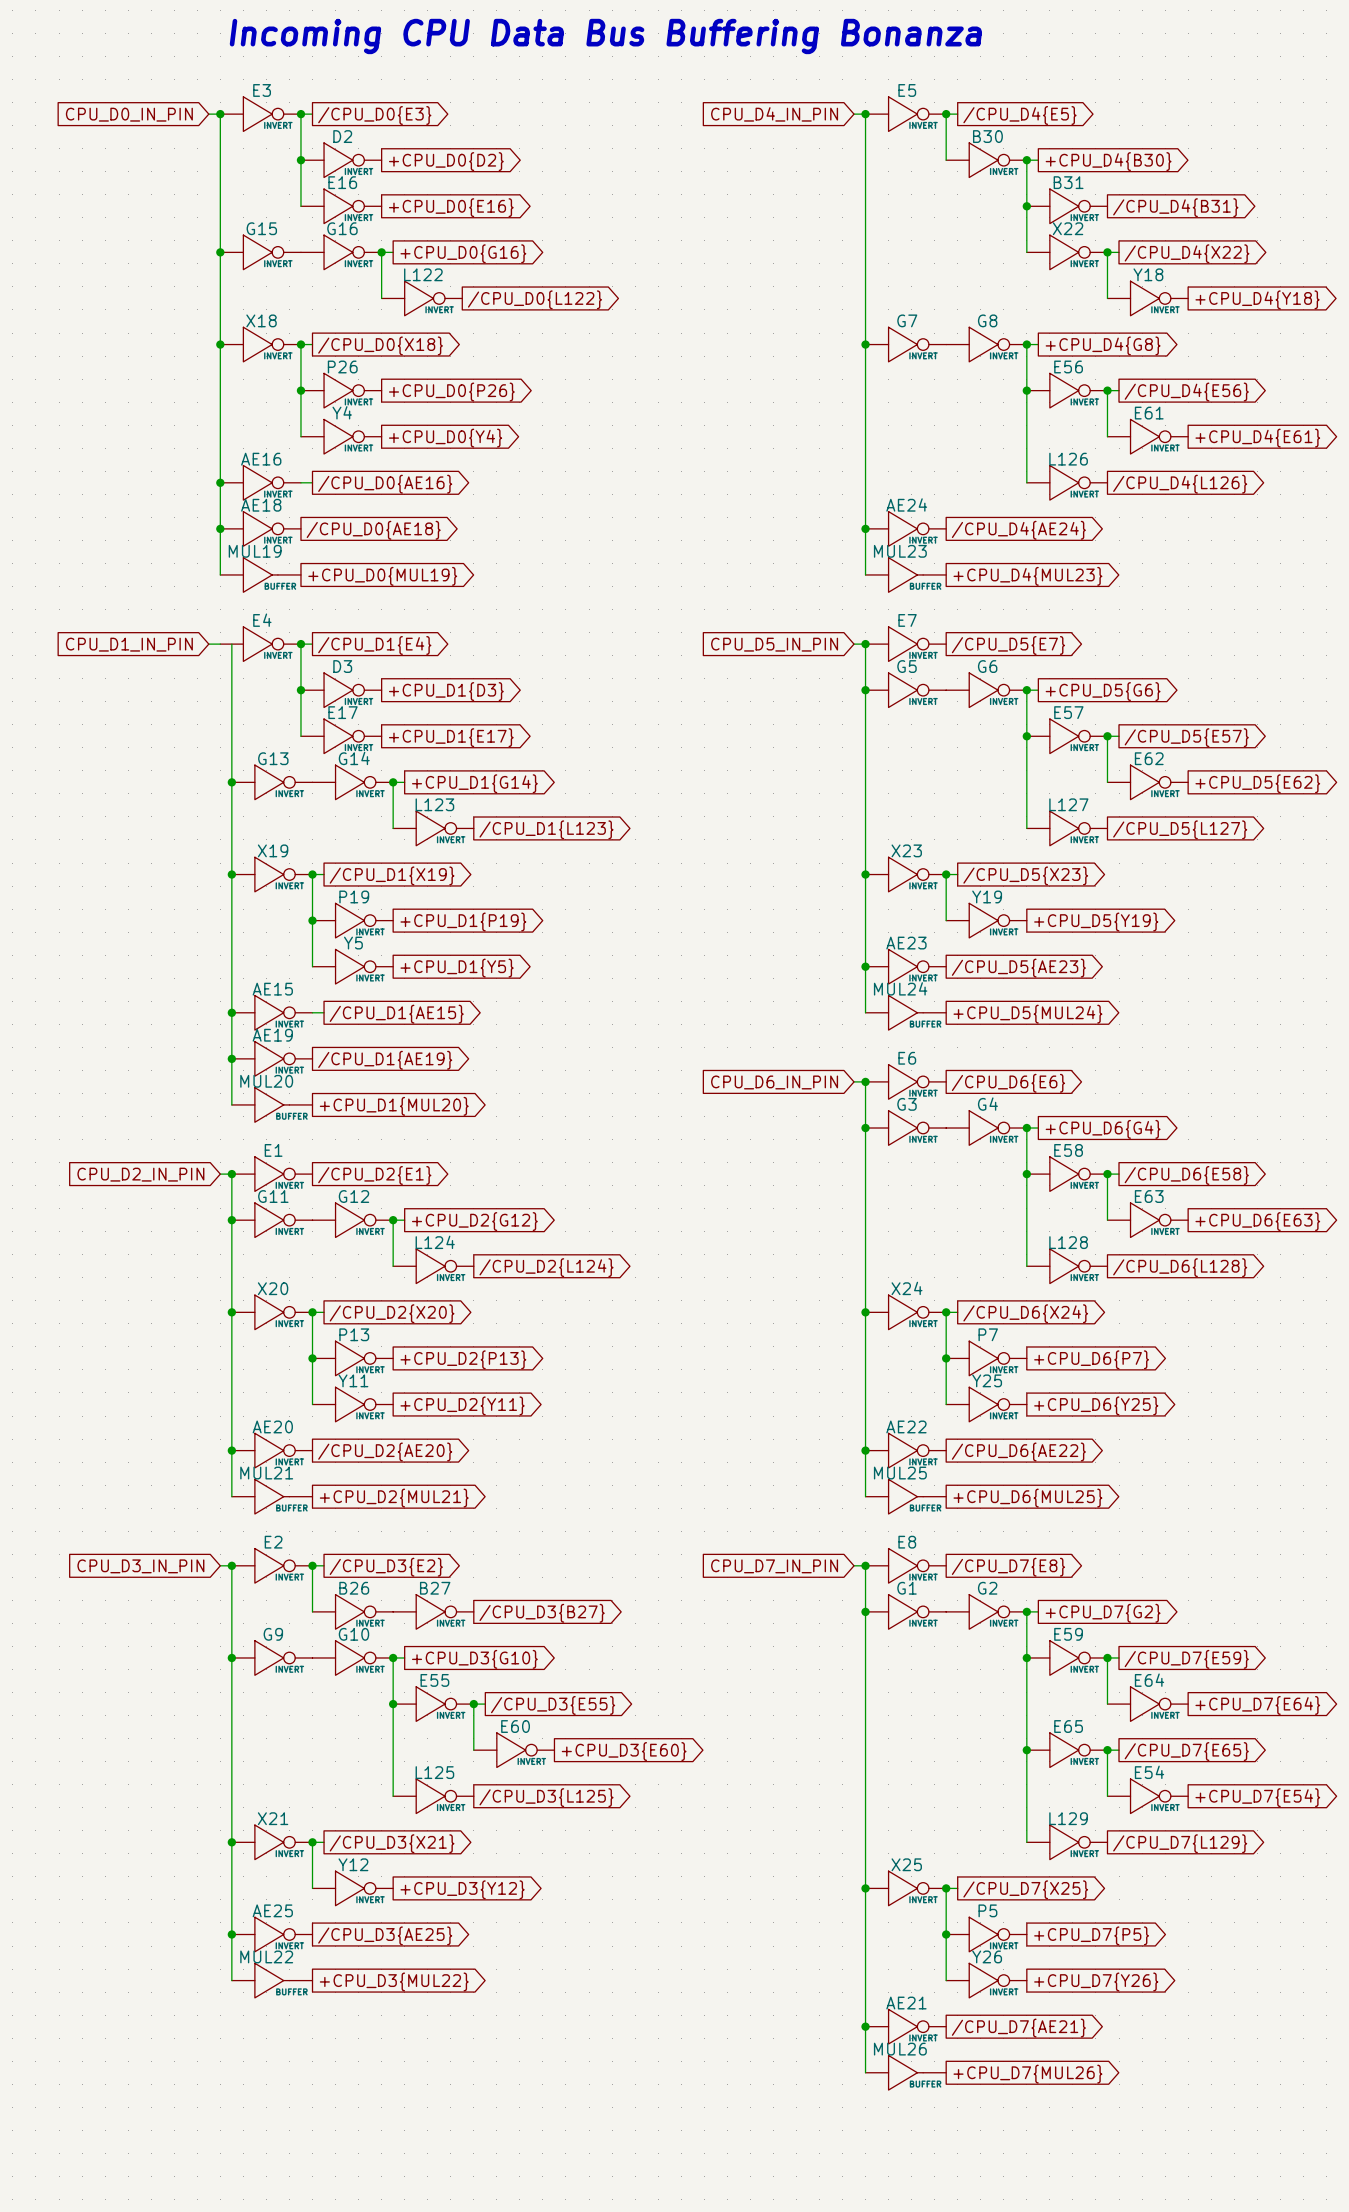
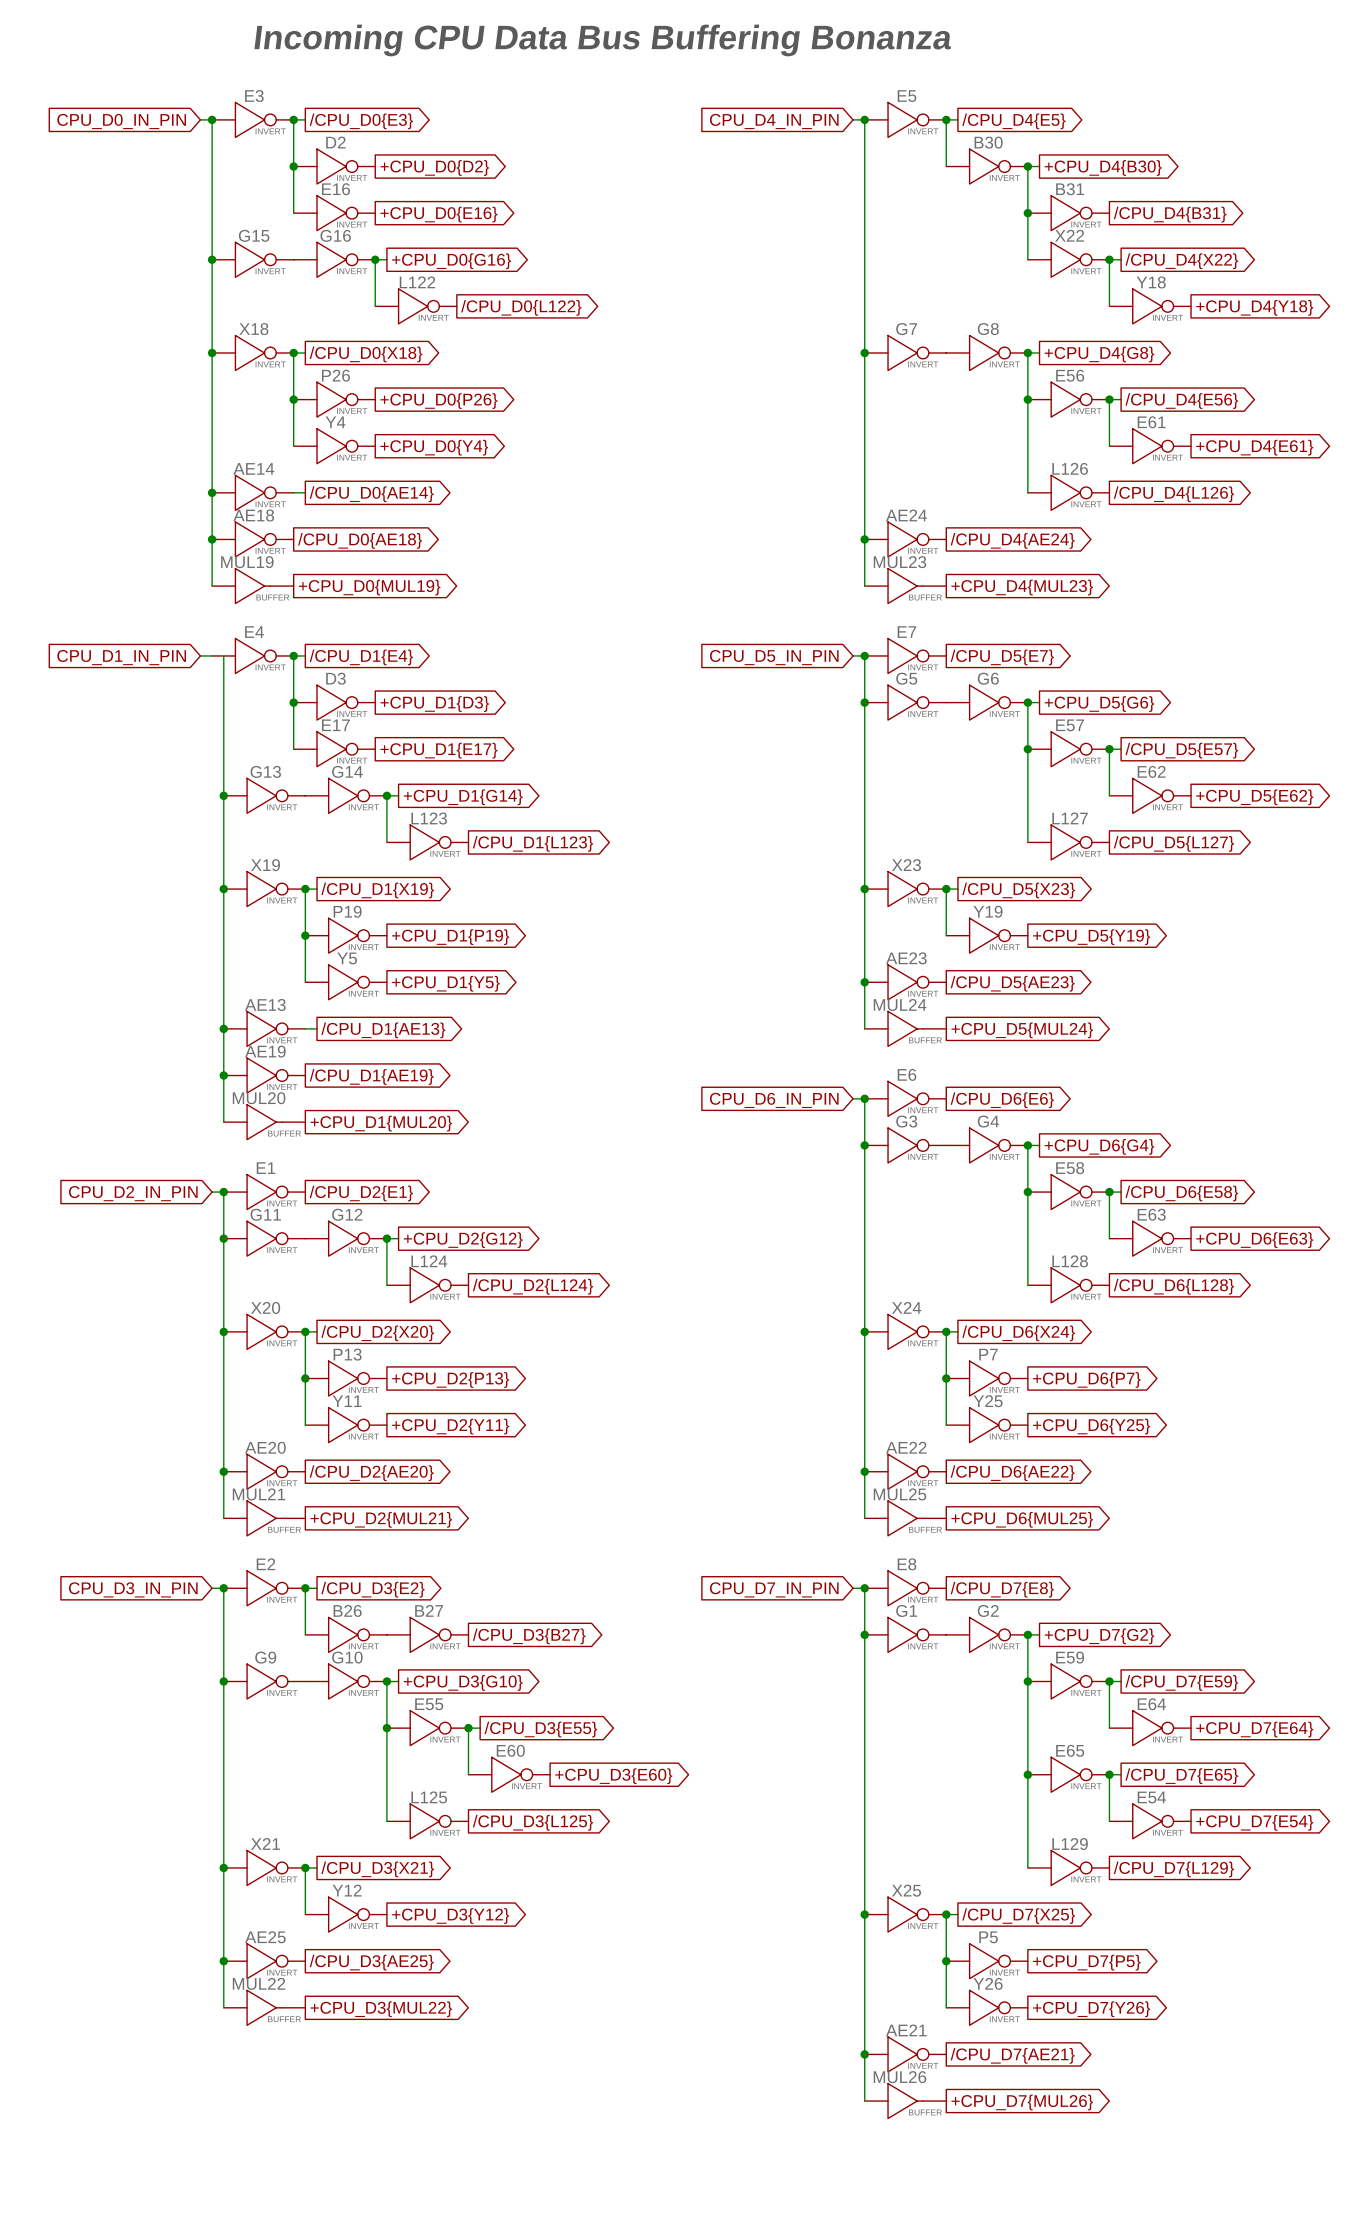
AE16 name: AE16 (261, 459) -> AE14 (253, 468)
global label: /CPU_D0{AE16} (385, 484) -> /CPU_D0{AE14} (371, 494)
AE15 name: AE15 (272, 989) -> AE13 (265, 1004)
global label: /CPU_D1{AE15} (396, 1014) -> /CPU_D1{AE13} (383, 1030)

